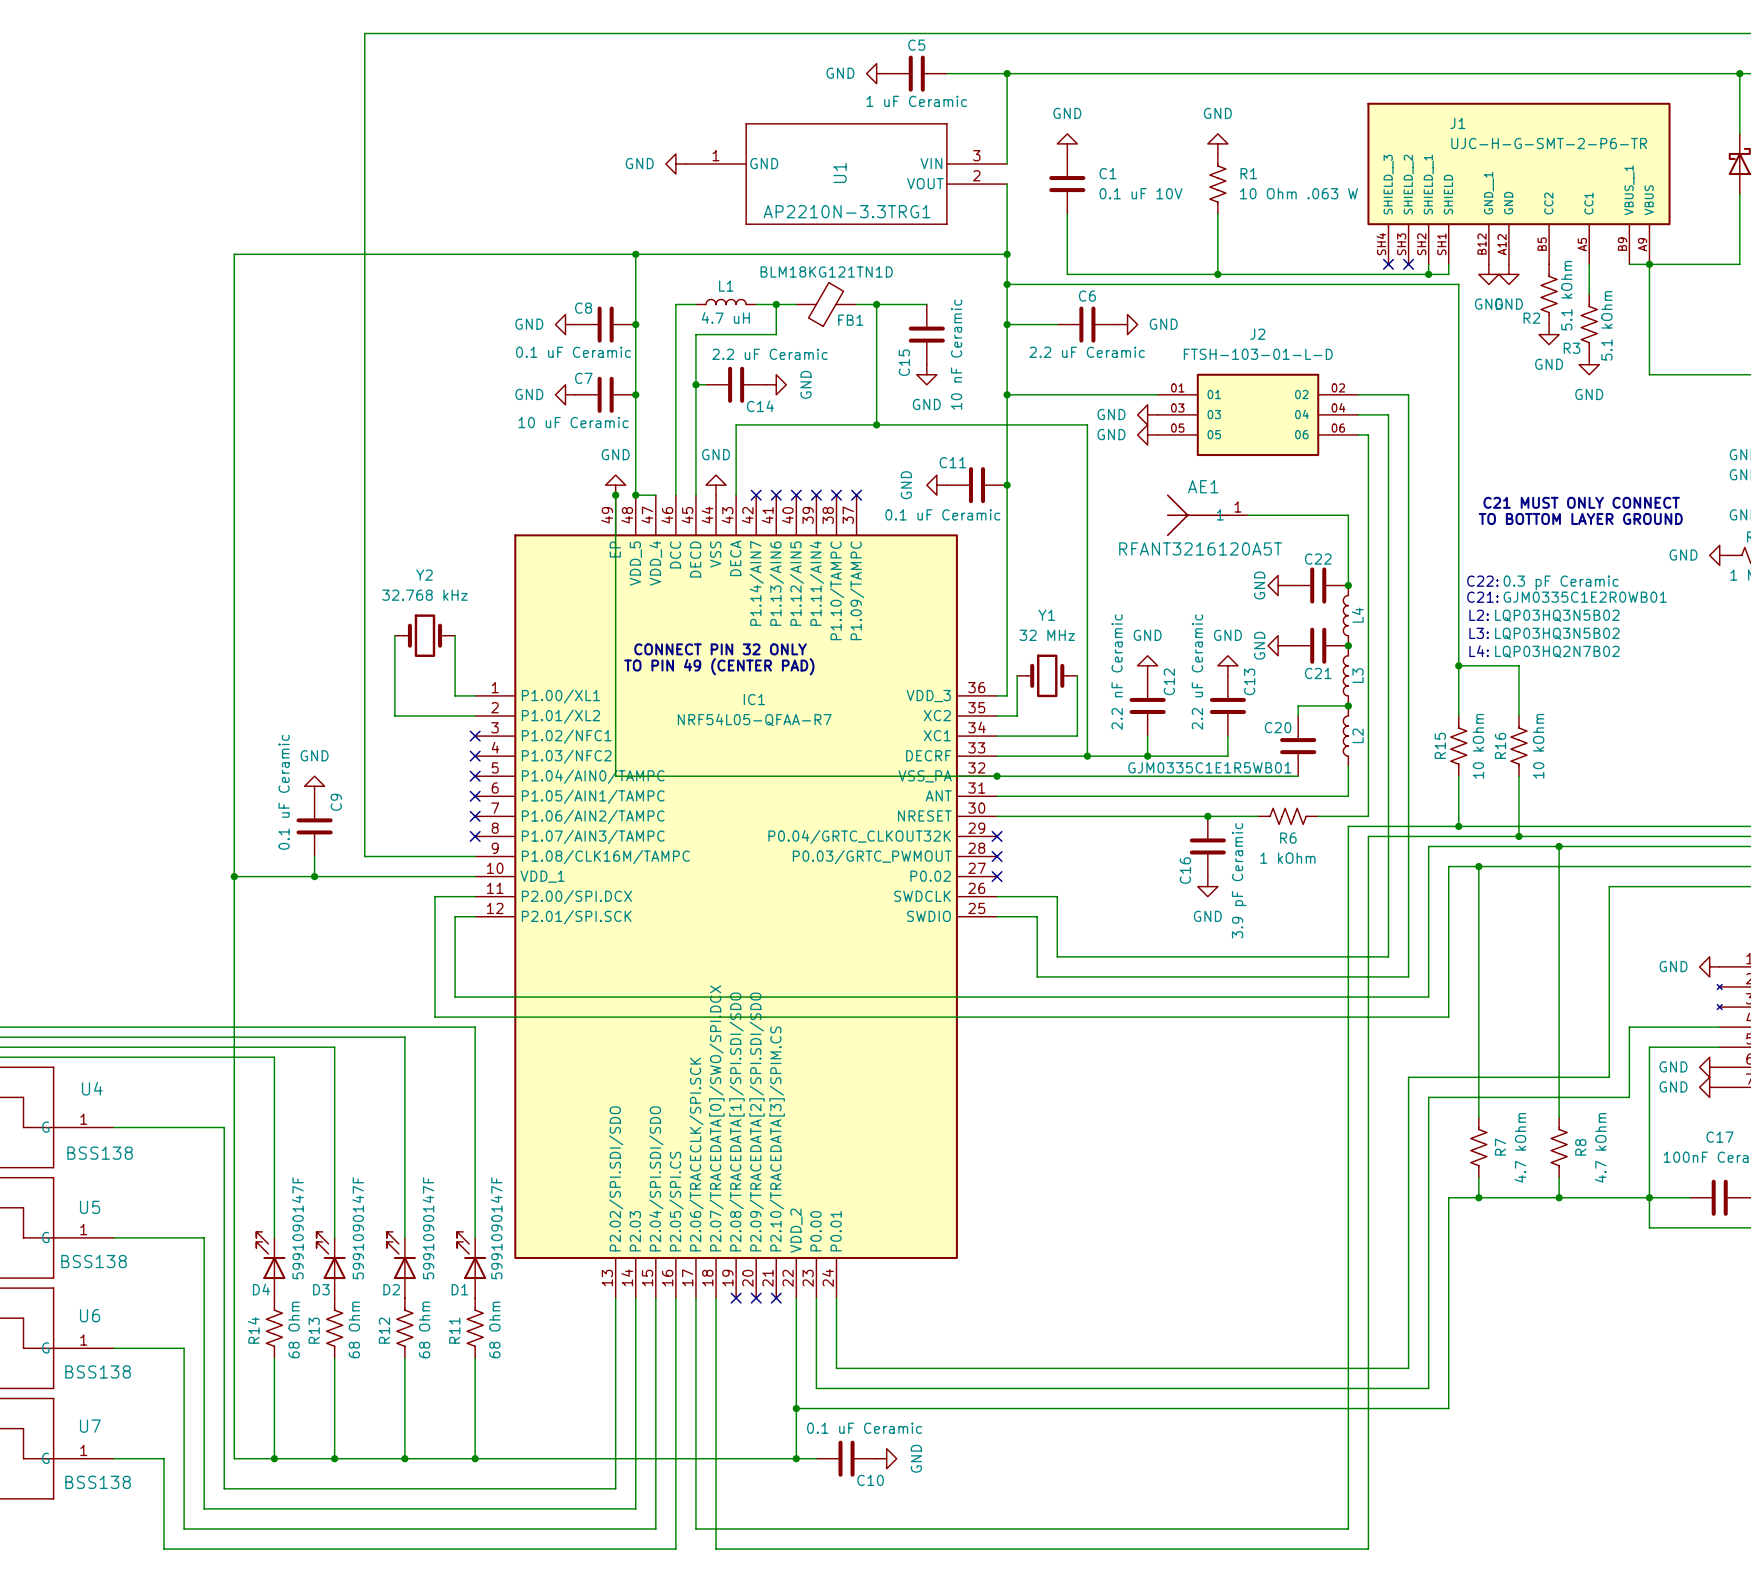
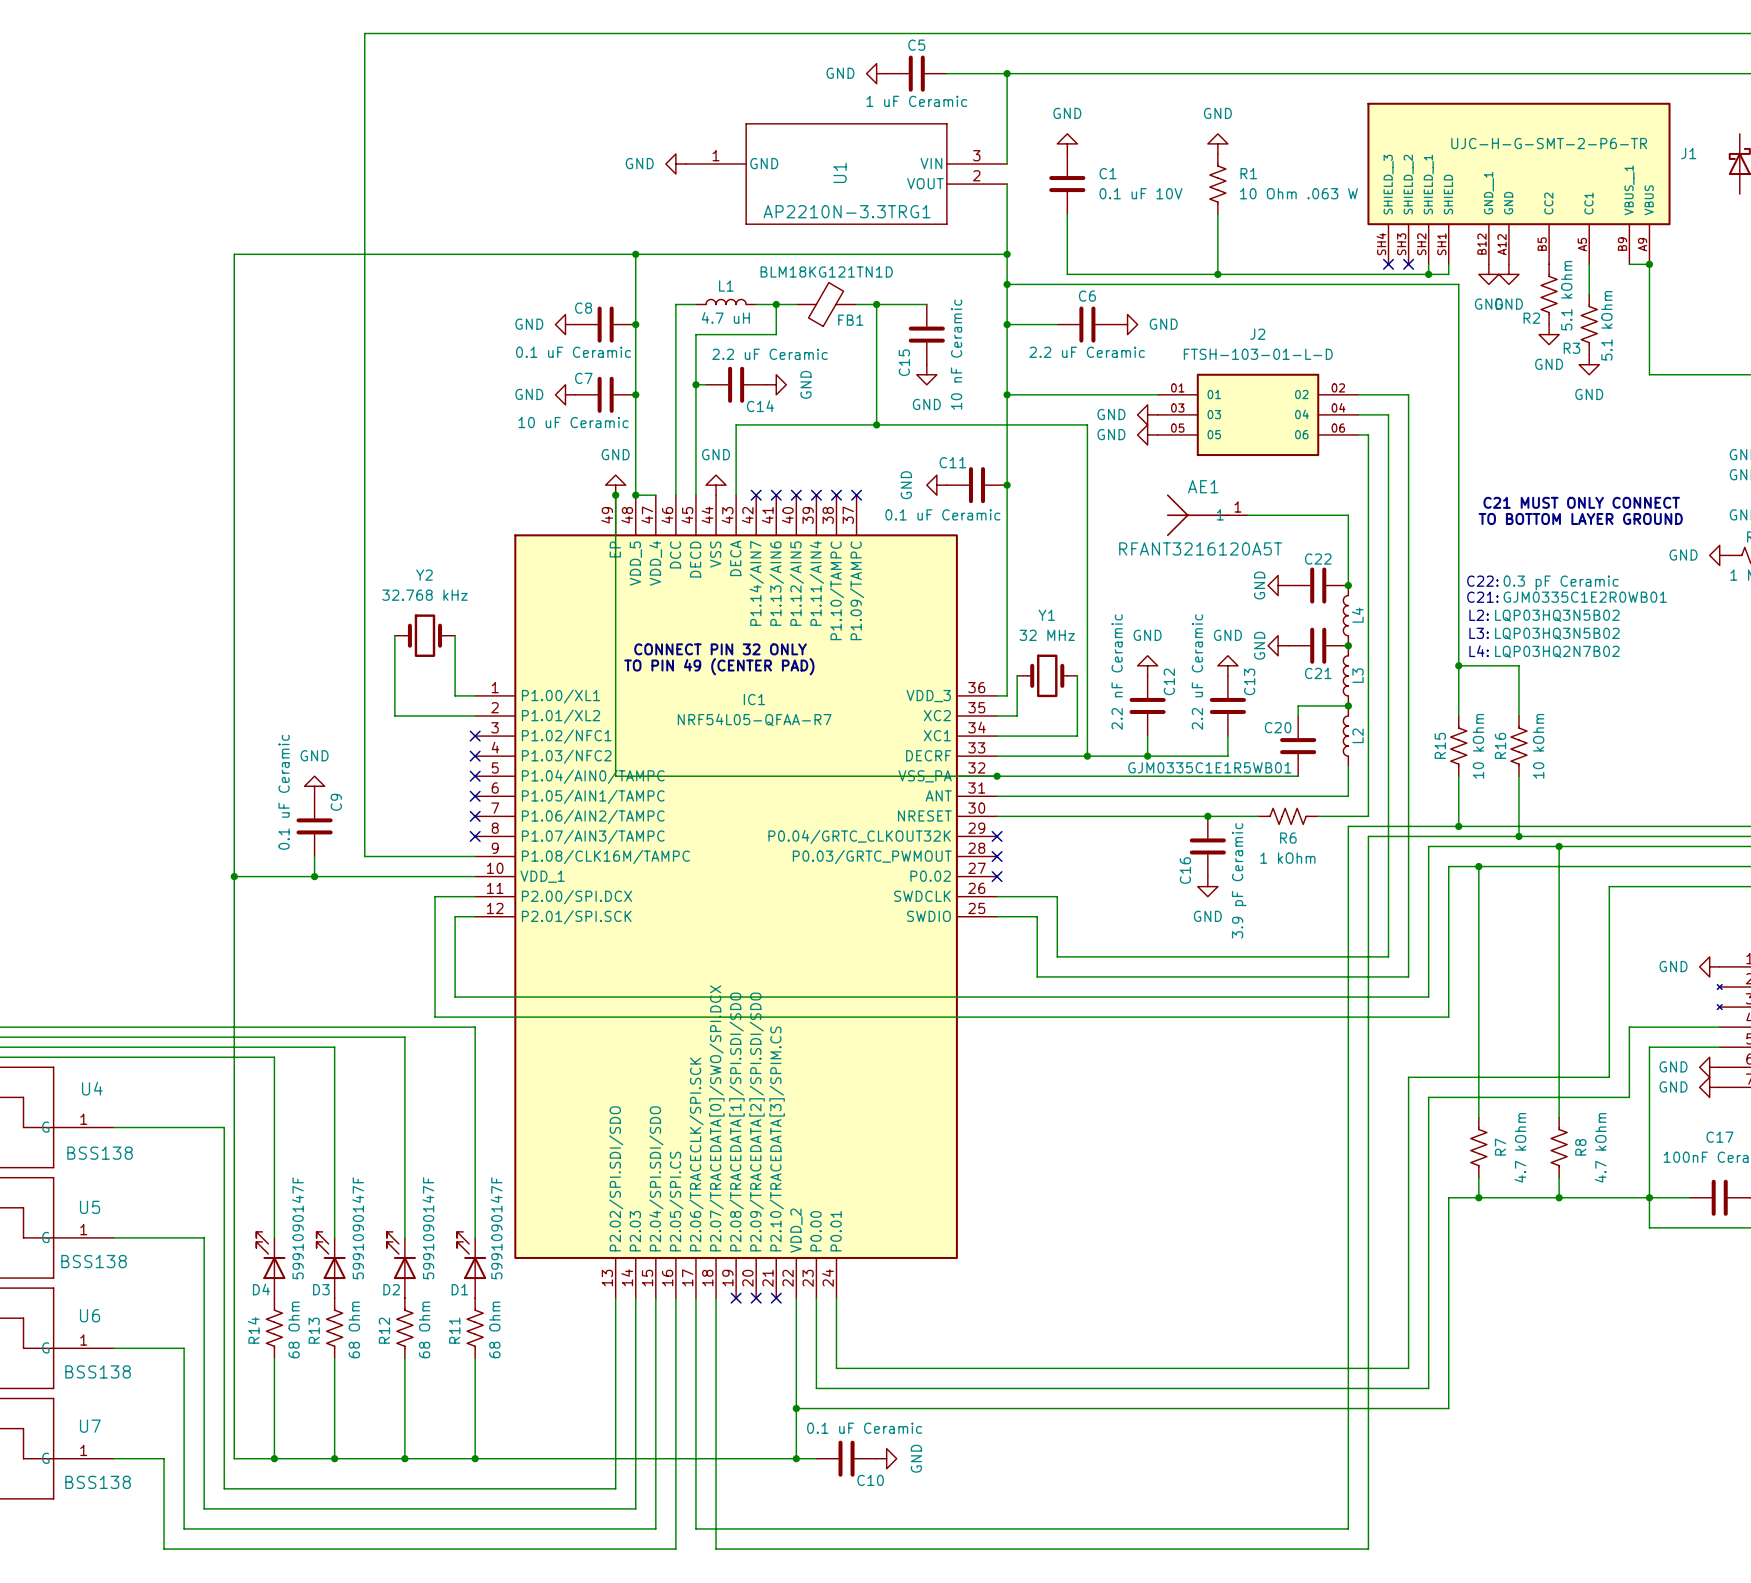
wire: (1739, 73) (1739, 133) -> none
junction: (1739, 73) -> none
J1 name position: J1 (1457, 123) -> J1 (1688, 153)
wire: (1739, 194) (1739, 264) (1649, 264) -> none

